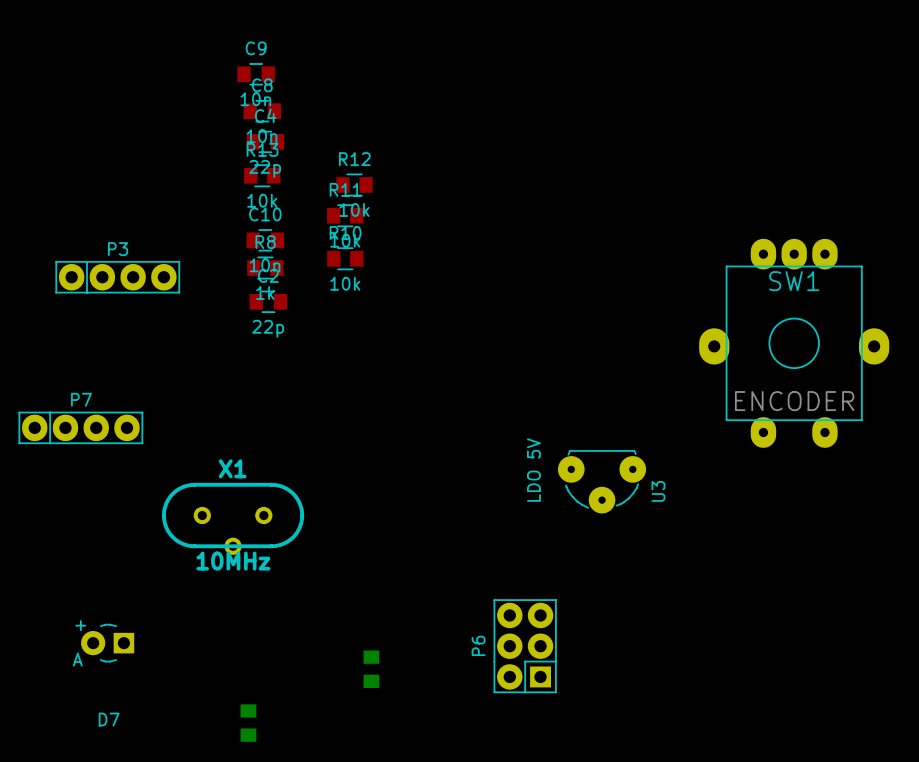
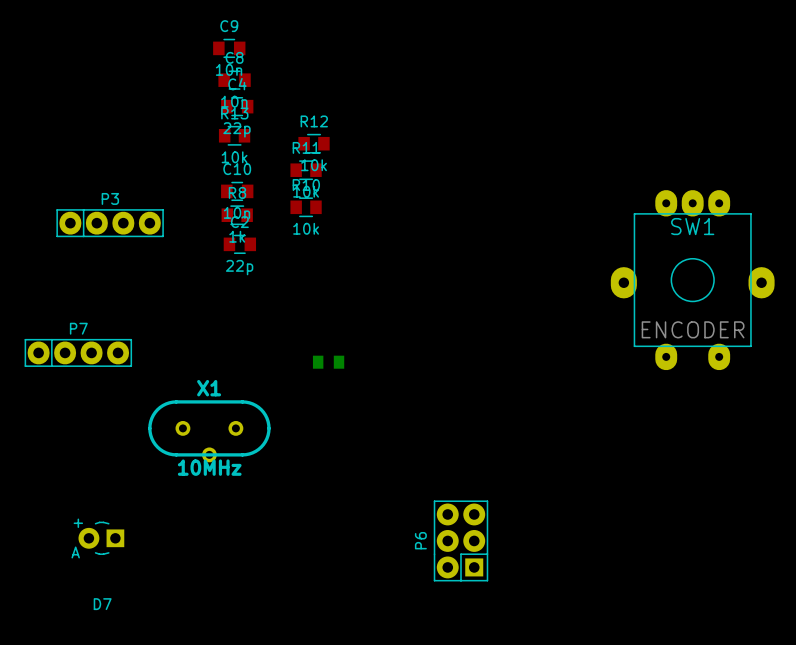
part: none -> (328, 362)
U3: LDO 5V (602, 481) -> none
part: (371, 669) -> none
part: (248, 723) -> none

